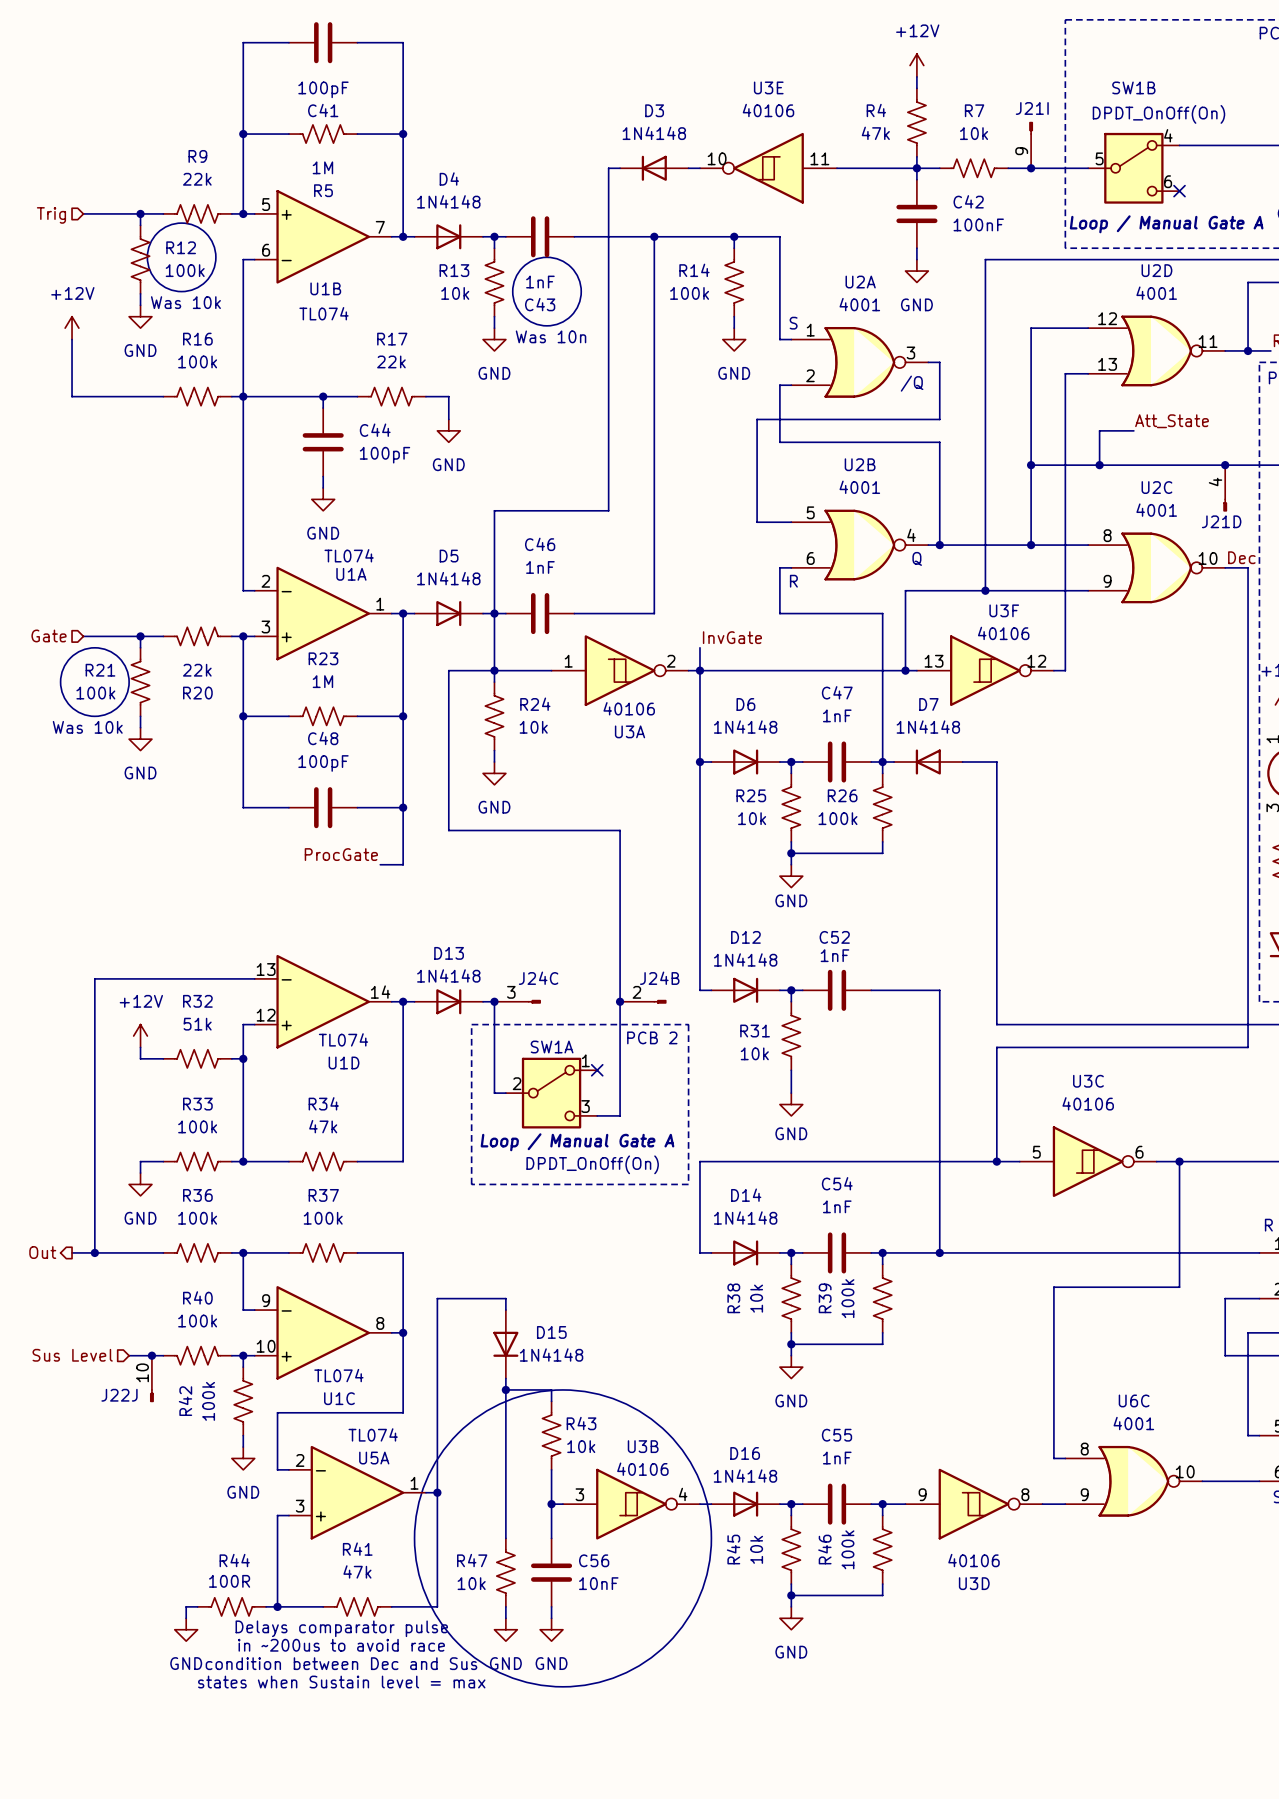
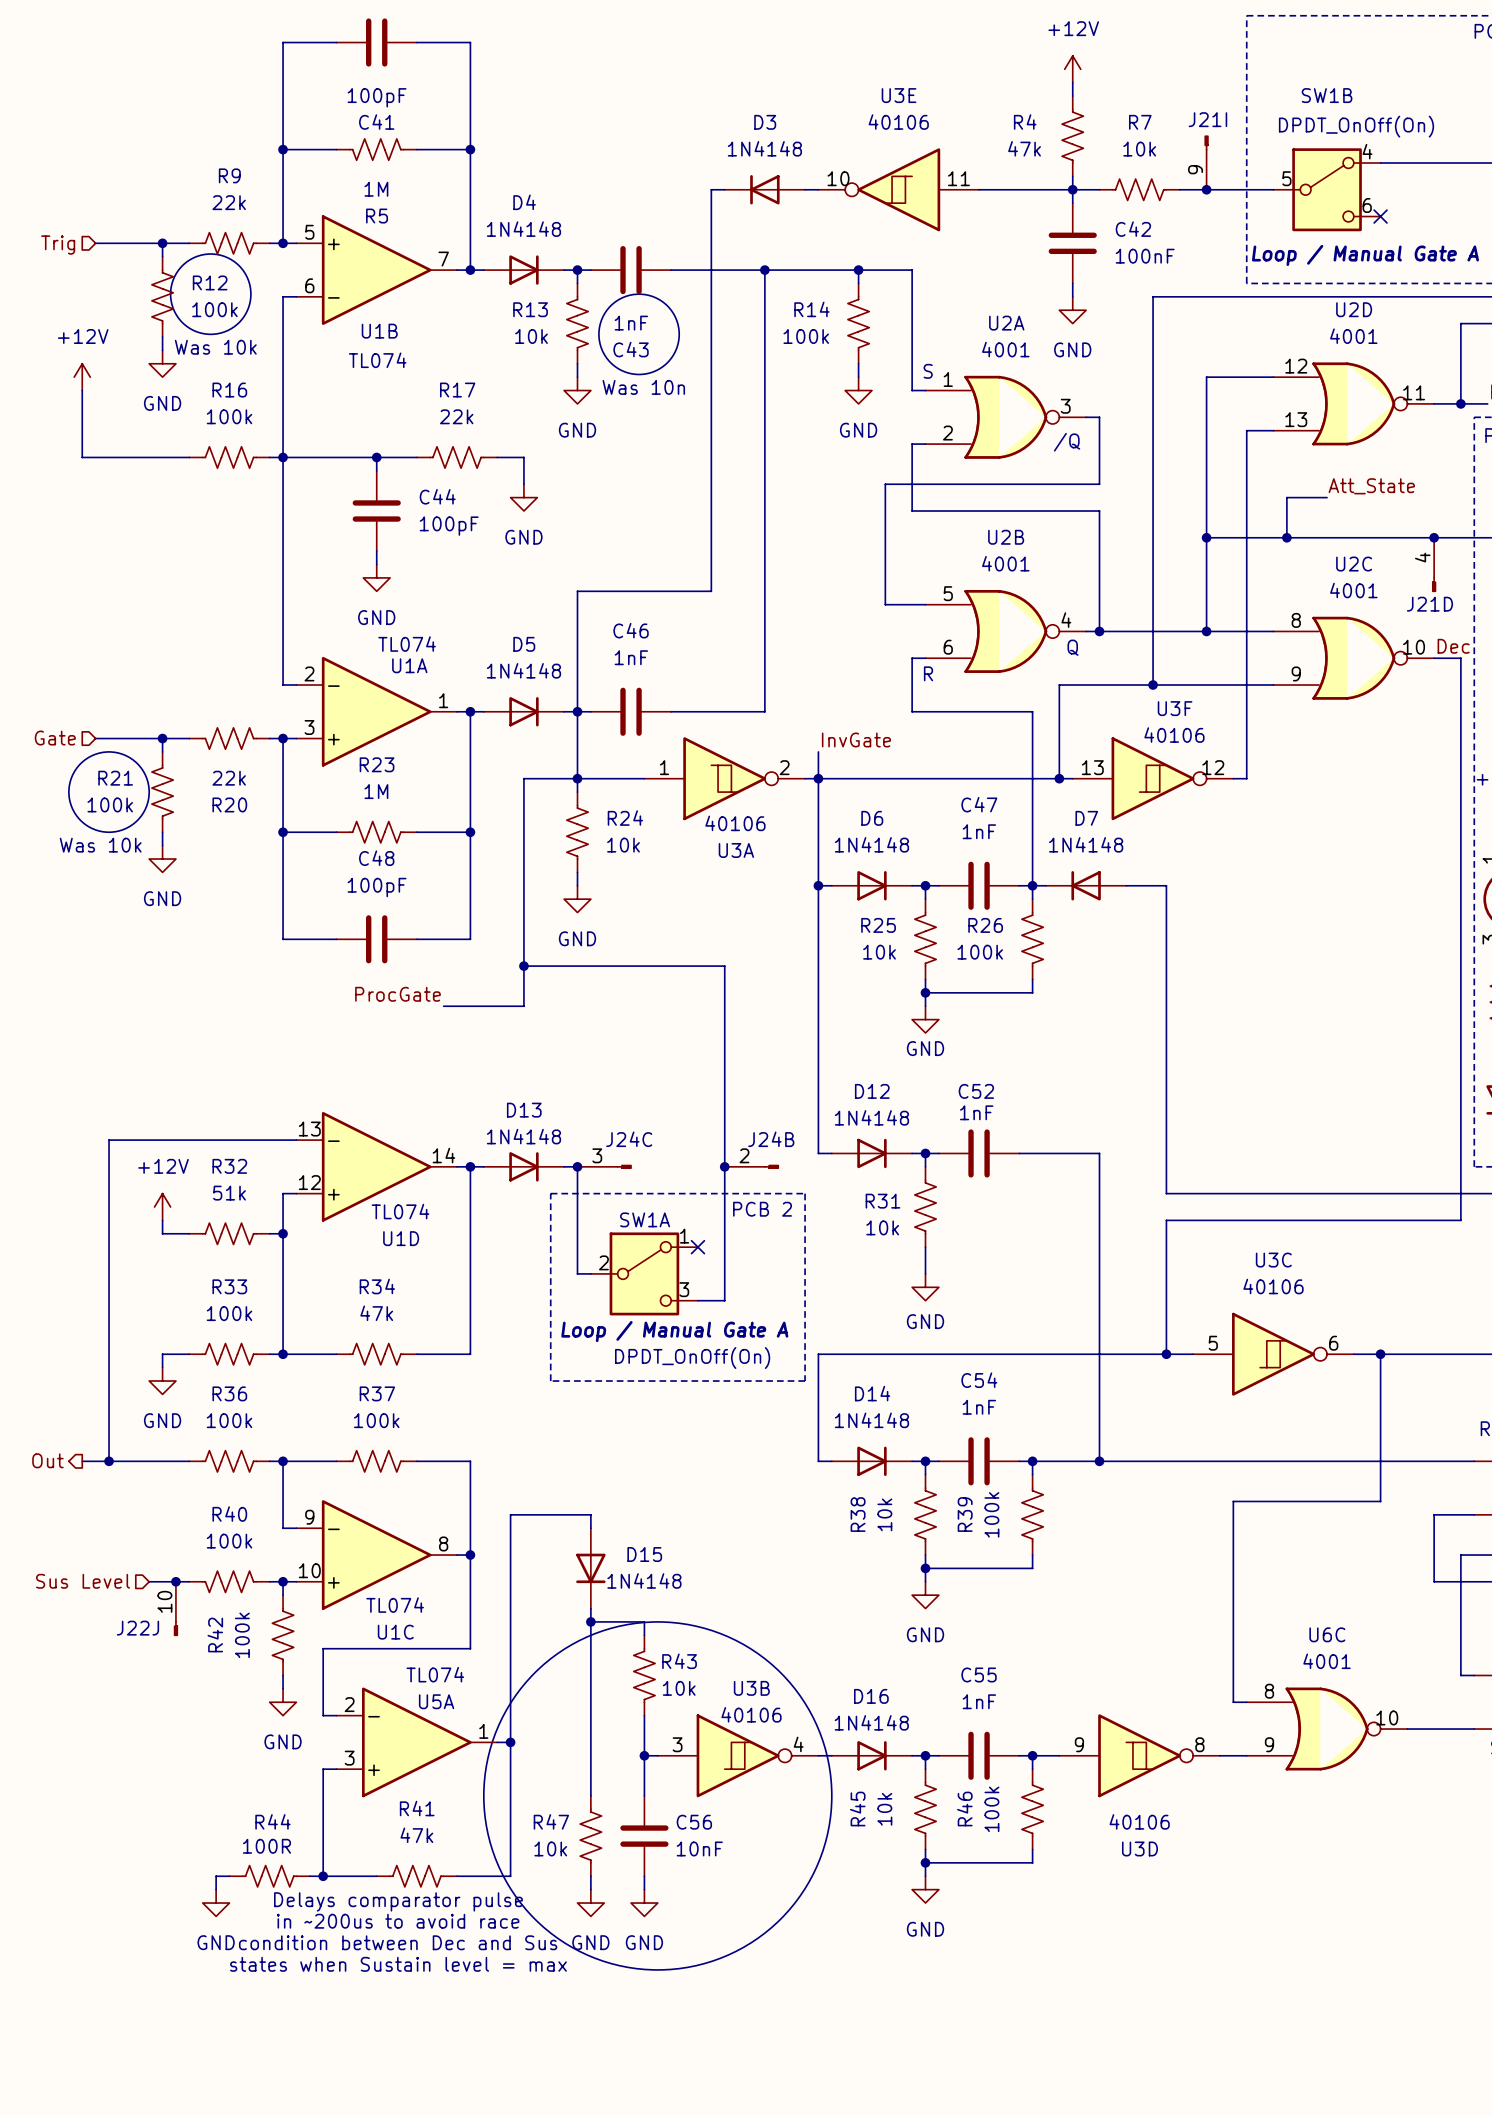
wire: (403, 807) (403, 864) -> (523, 966) (523, 1006) (470, 1006)
junction position: (403, 807) -> (523, 966)

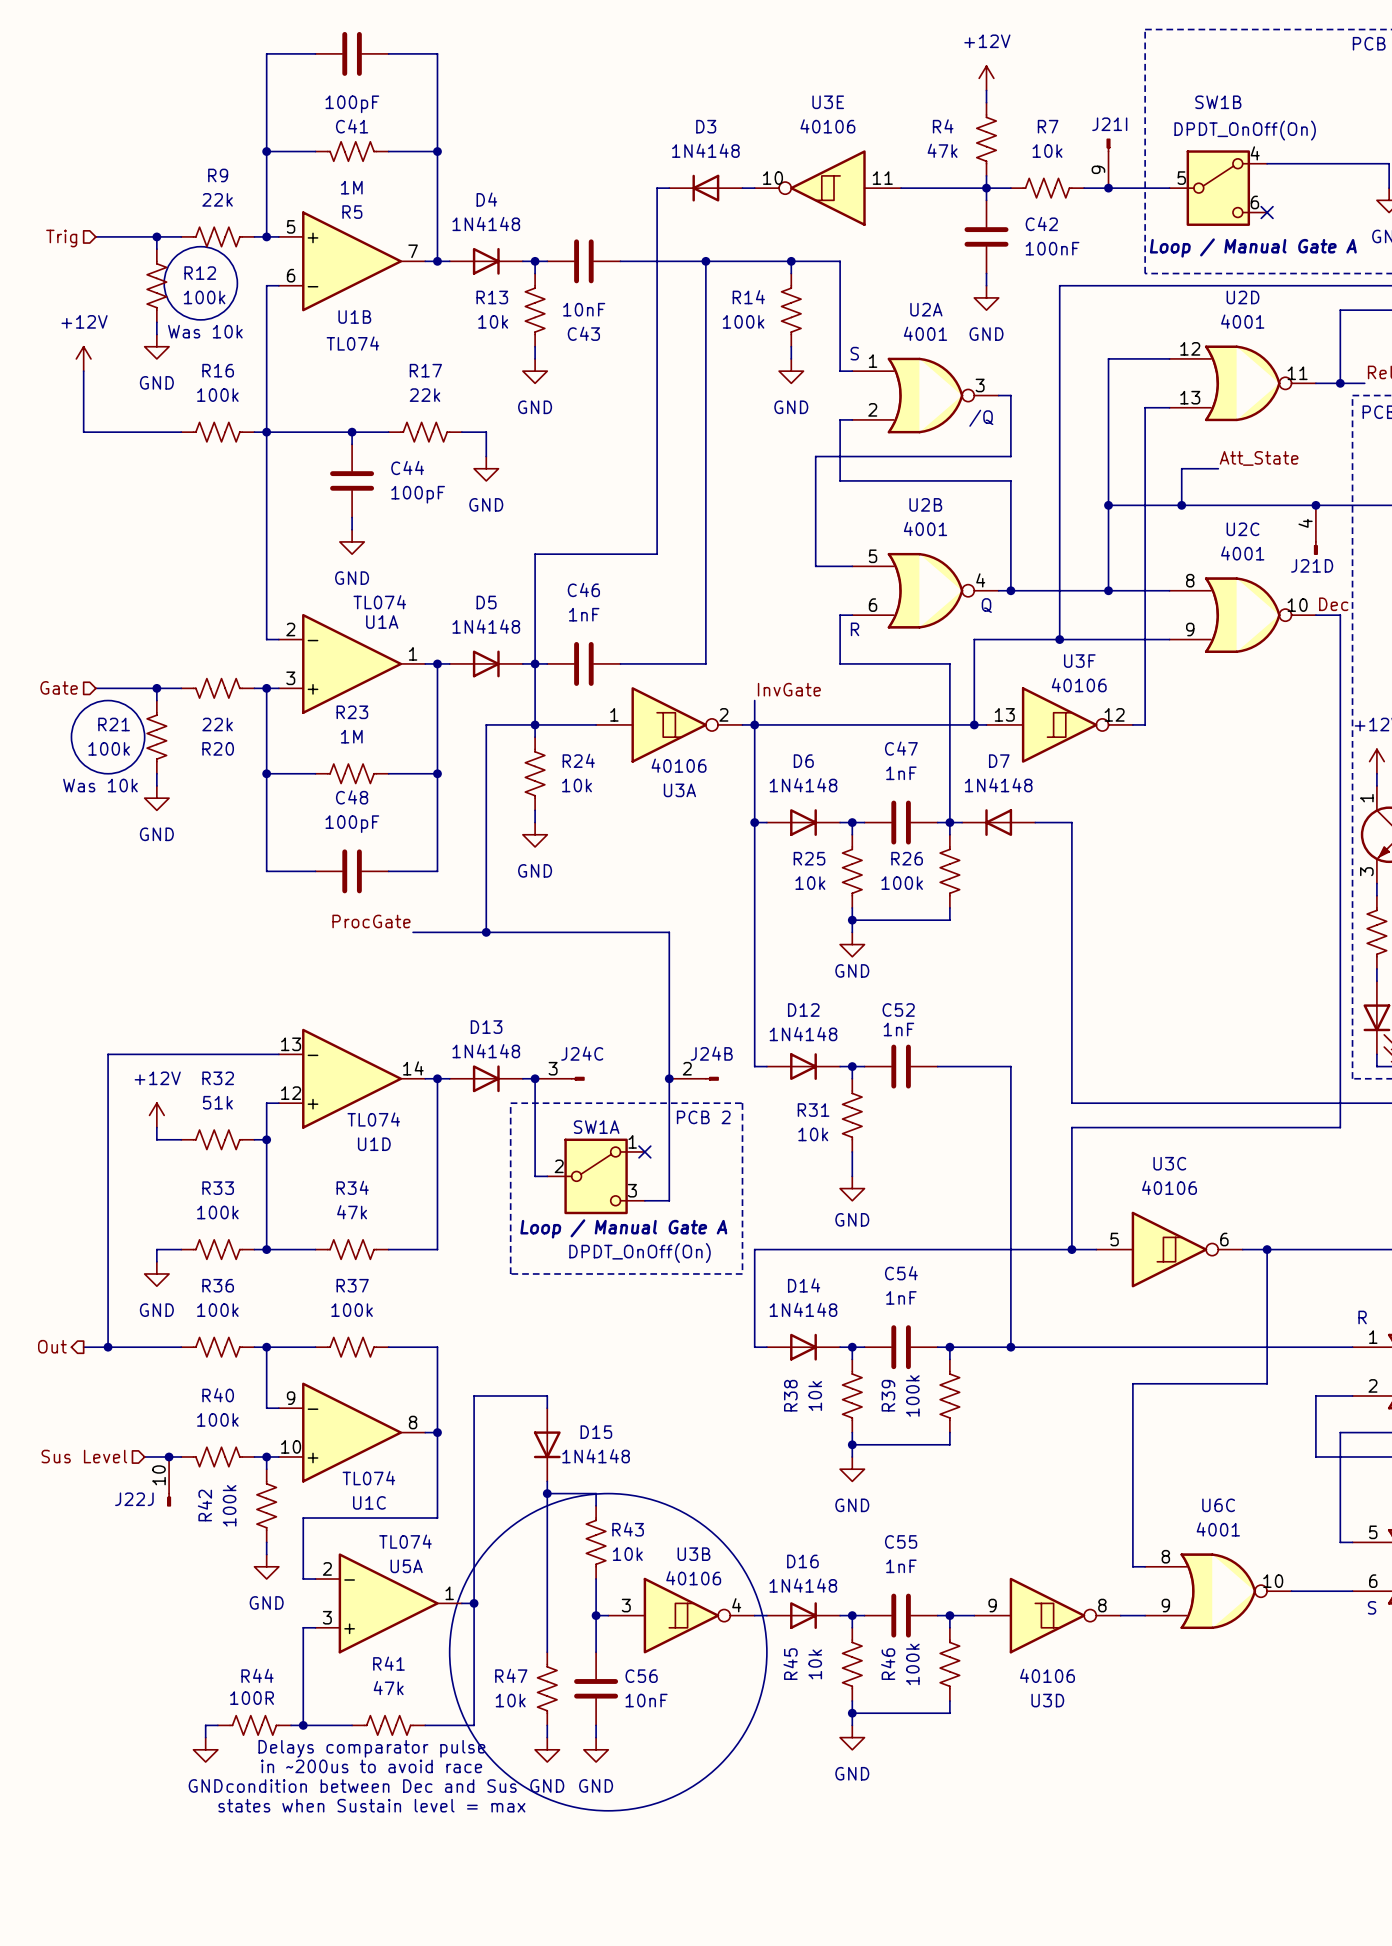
drawing: [598, 294, 680, 375] -> none
C43 value: 1nF (631, 323) -> 10nF (584, 309)
text: Was 10n (643, 387) -> none
wire: (523, 966) (724, 966) (724, 1006) -> (486, 932) (669, 932)
junction position: (523, 966) -> (486, 932)

